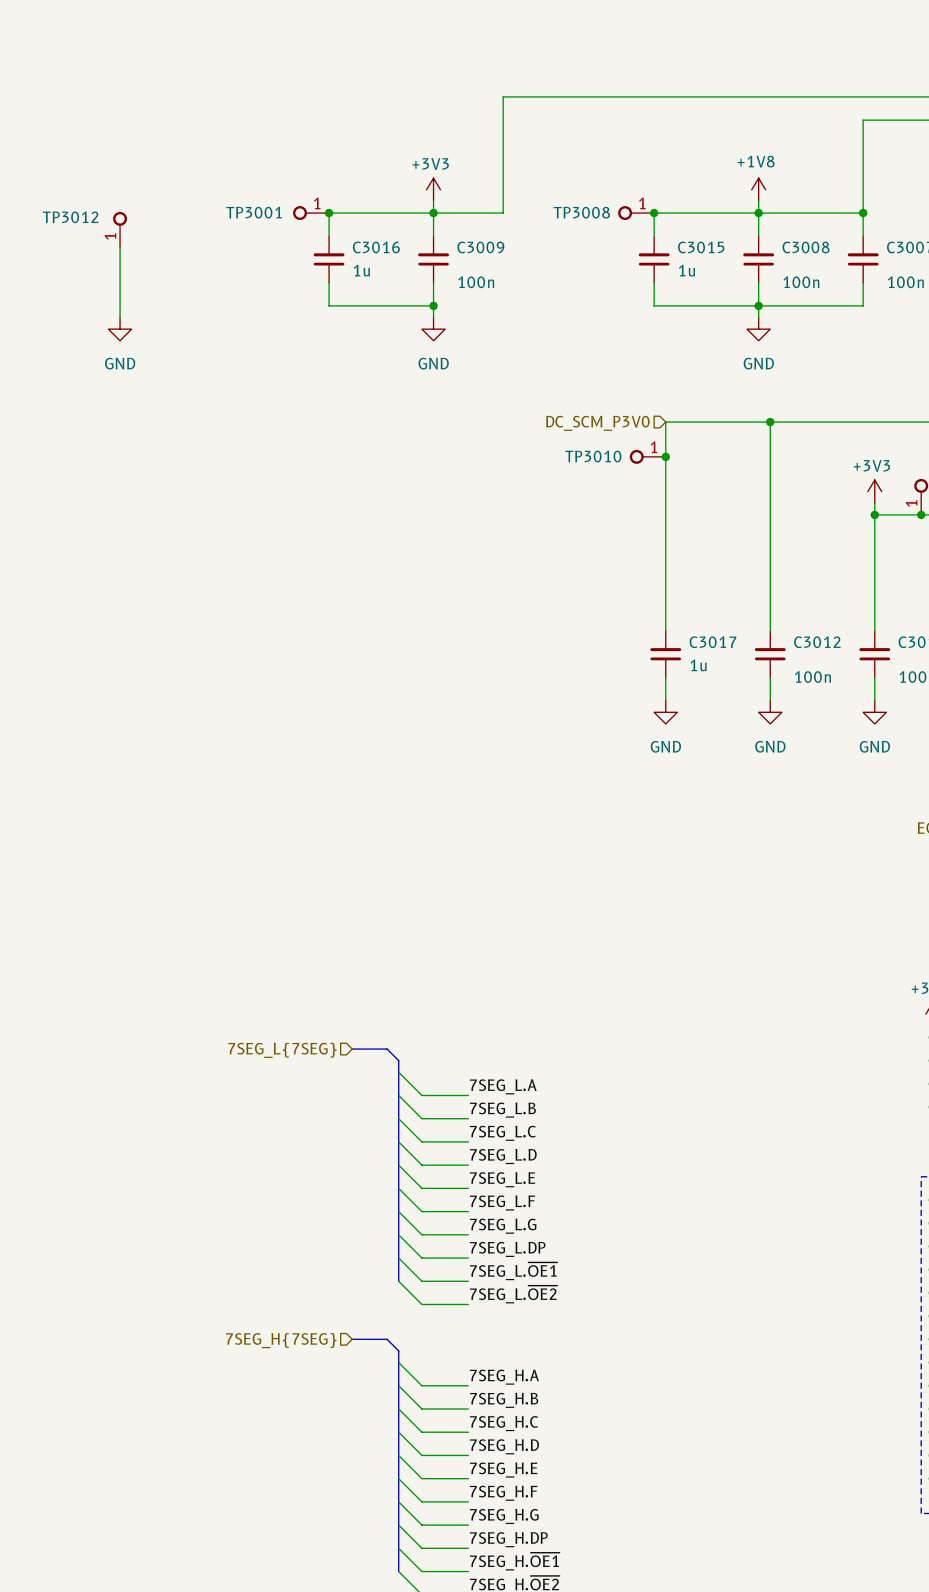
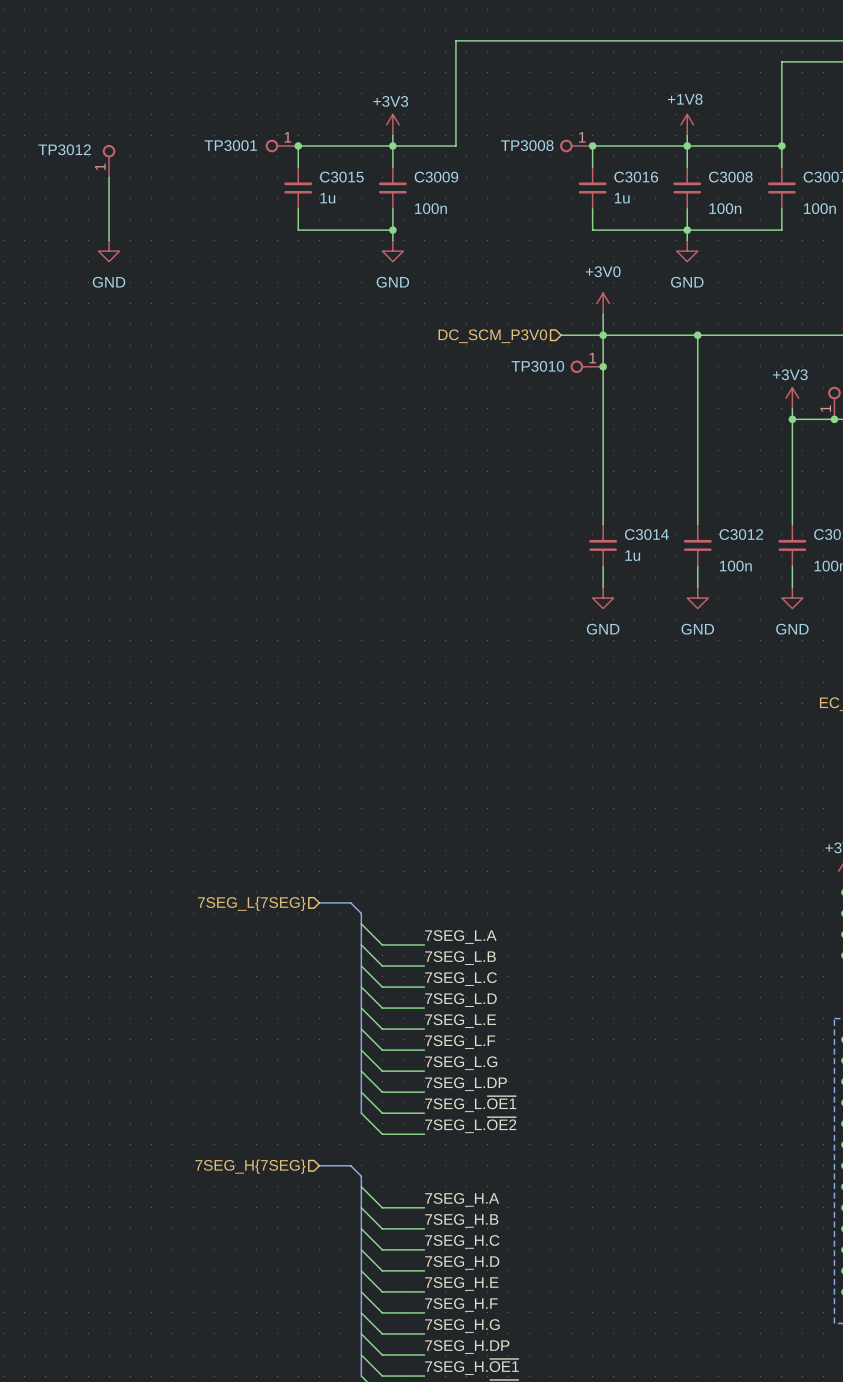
C3016 name: C3016 (376, 247) -> C3015 (341, 177)
C3015 name: C3015 (701, 247) -> C3016 (636, 177)
power symbol: none -> +3V0 (603, 303)
wire: none -> (603, 314) (603, 335) (561, 335)
junction: none -> (603, 335)
hierarchical label position: DC_SCM_P3V0 (597, 423) -> DC_SCM_P3V0 (492, 336)
C3017 name: C3017 (713, 642) -> C3014 (646, 534)

